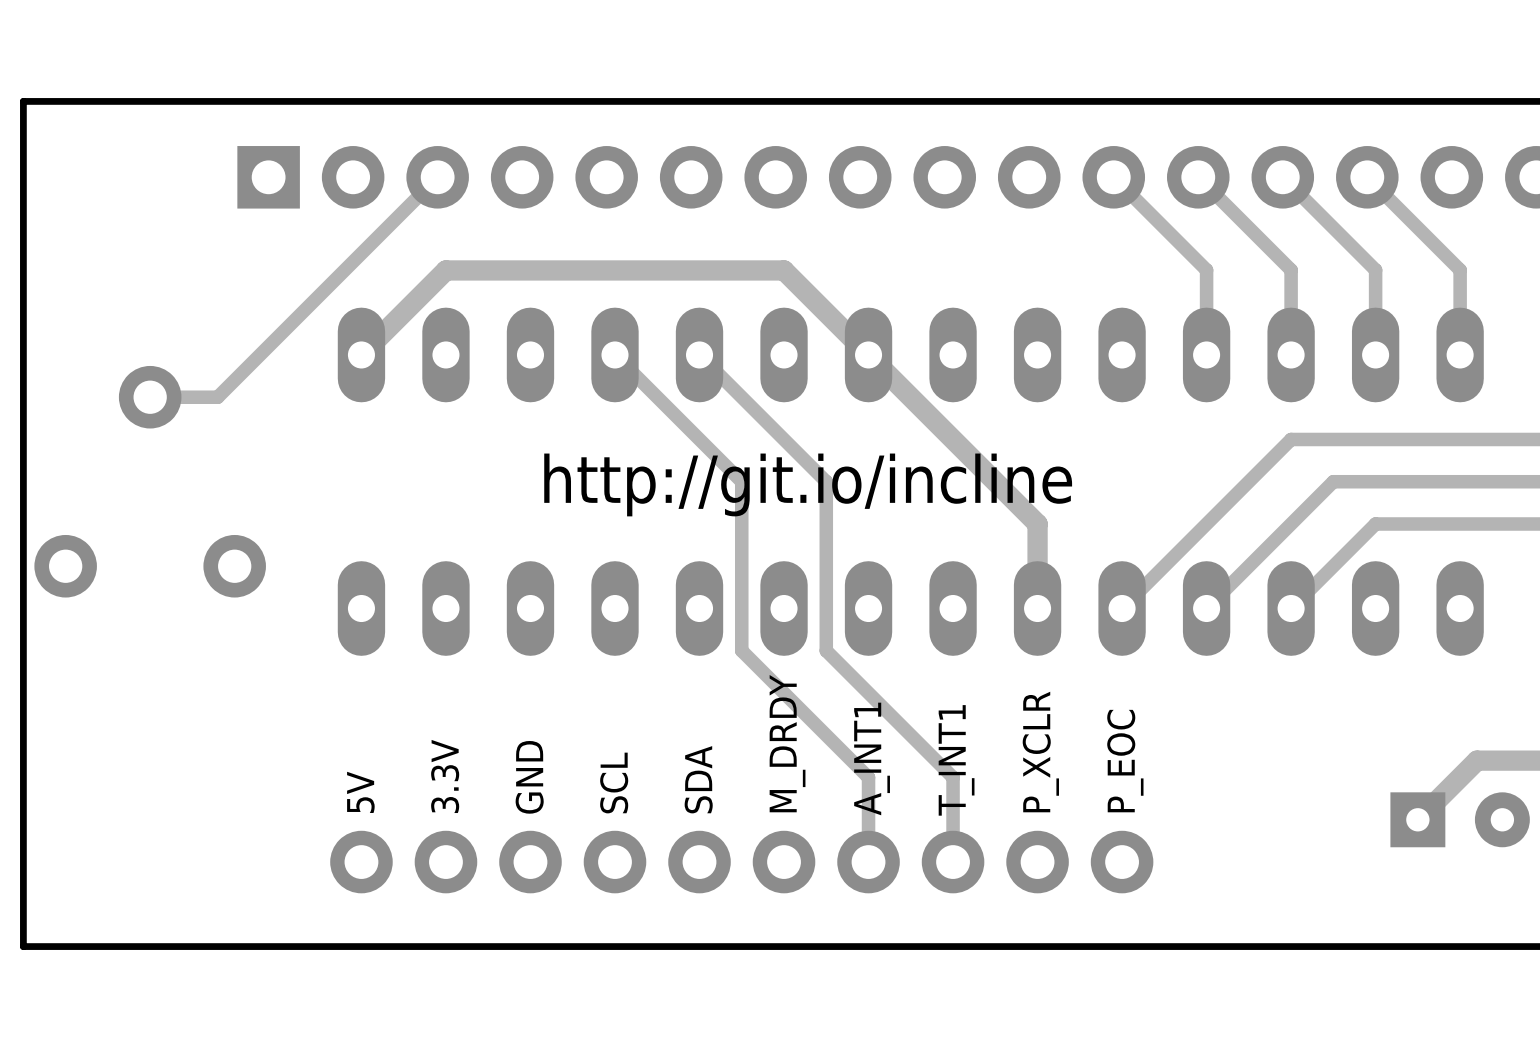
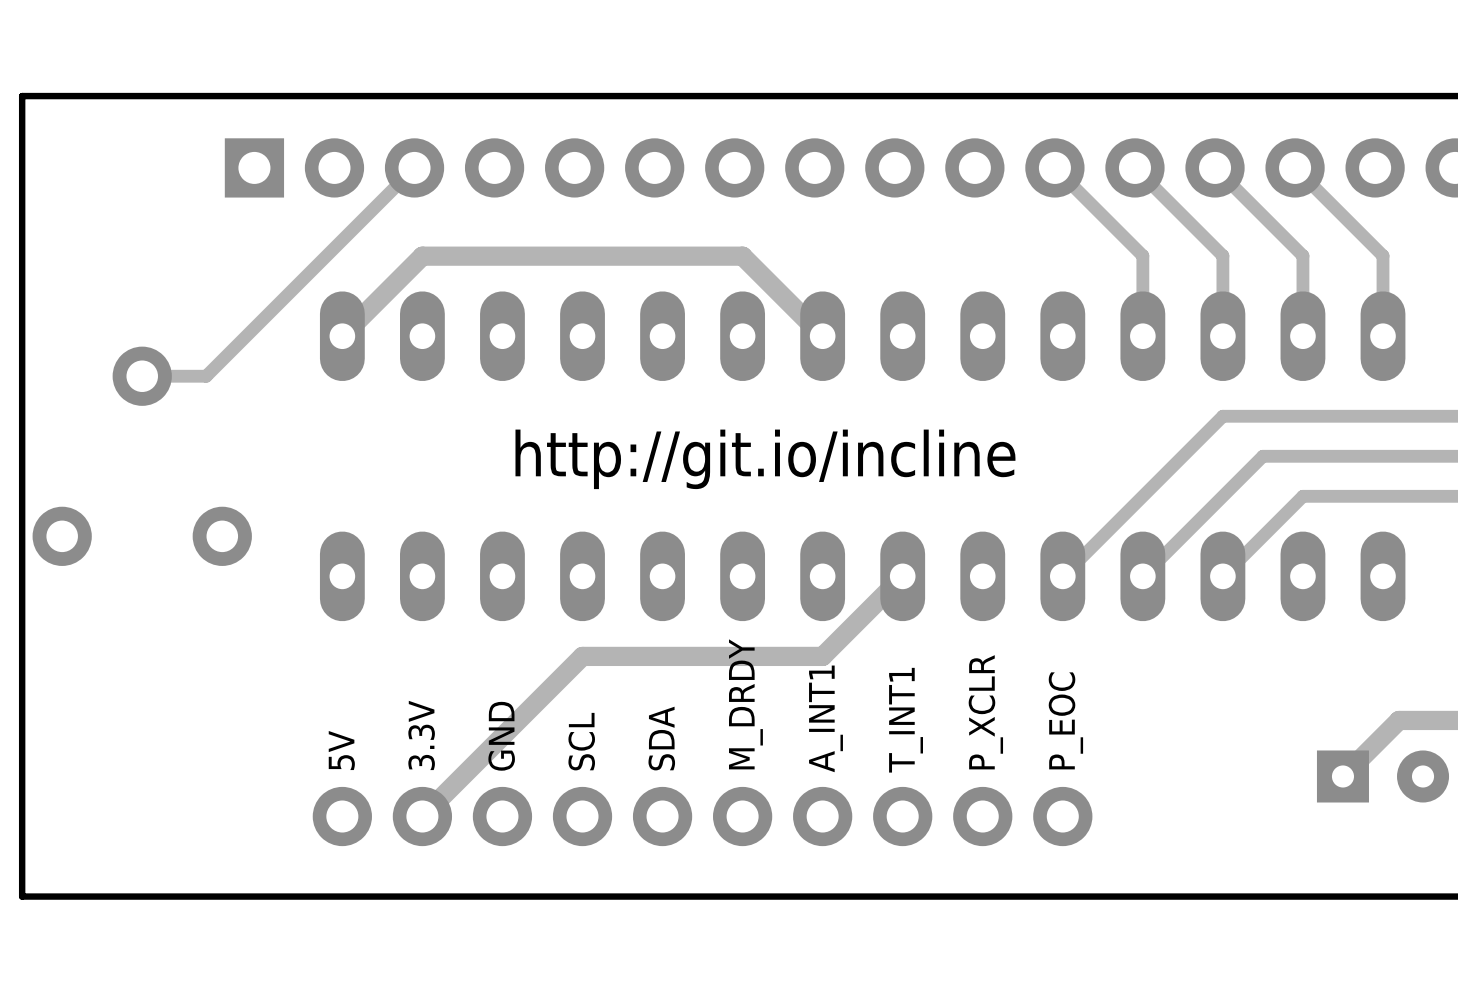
track: (614, 354) (741, 481) (741, 650) (868, 777) (868, 862) -> none
track: (699, 354) (826, 481) (826, 650) (953, 777) (953, 862) -> none
track: (868, 354) (1037, 524) (1037, 608) -> none
track: none -> (902, 576) (822, 656) (582, 656) (422, 816)

